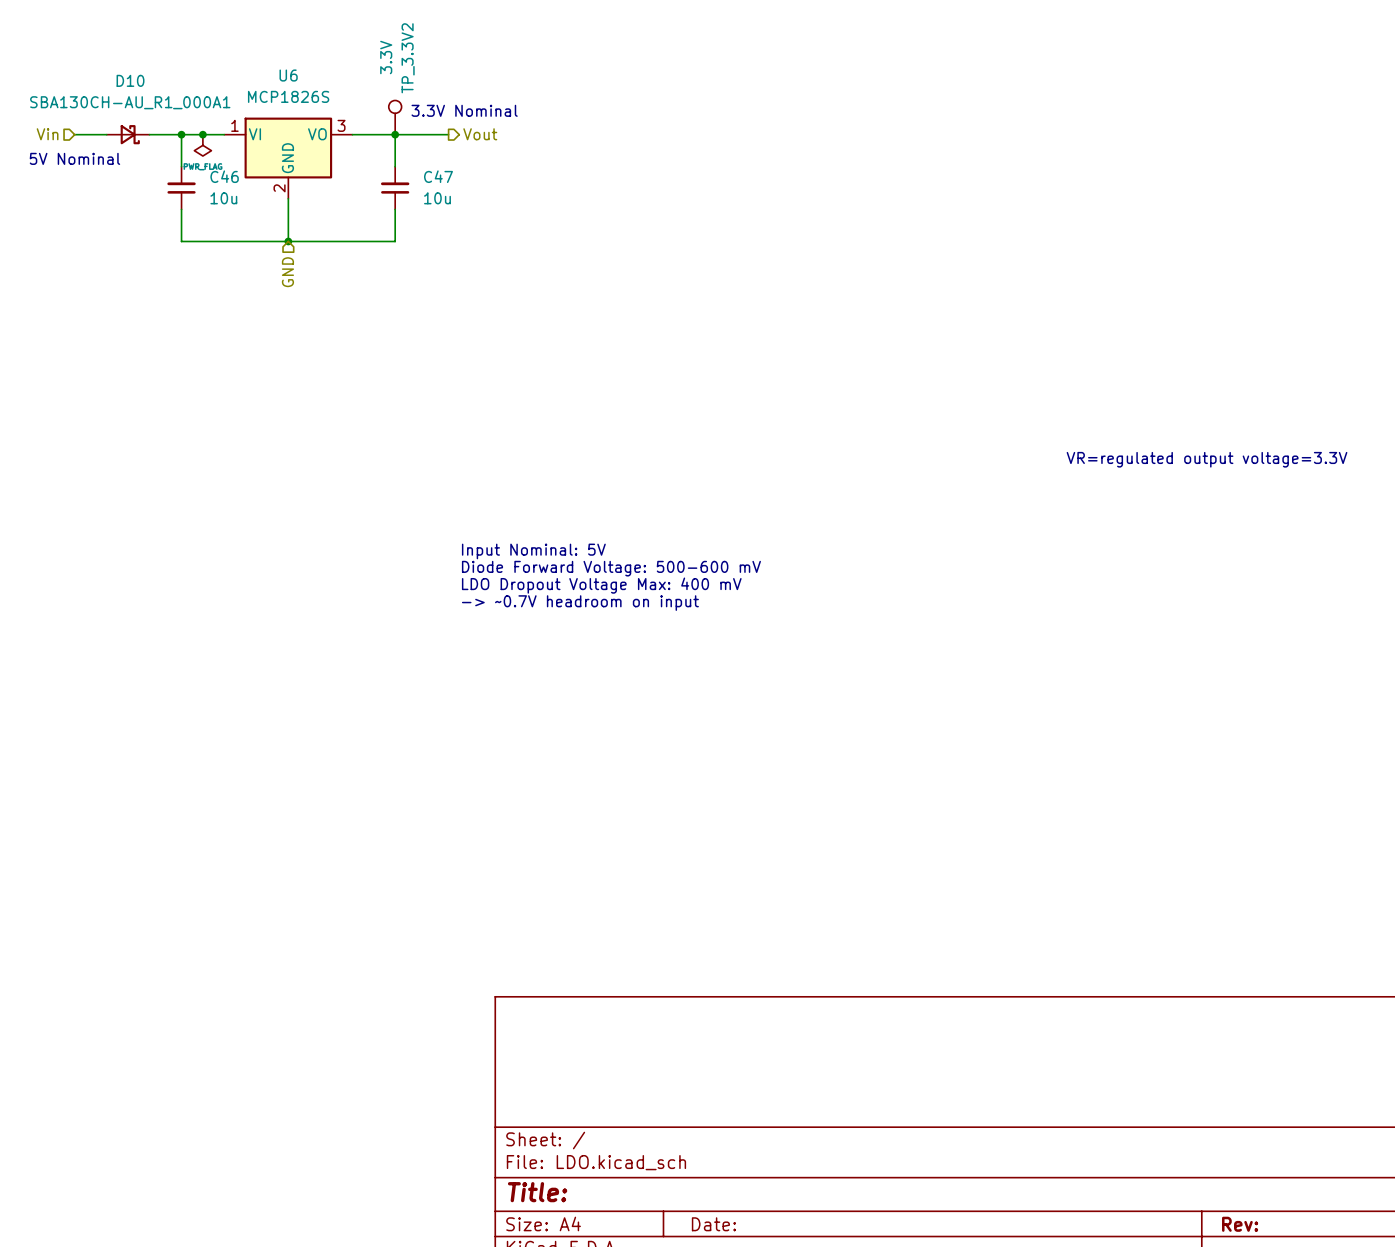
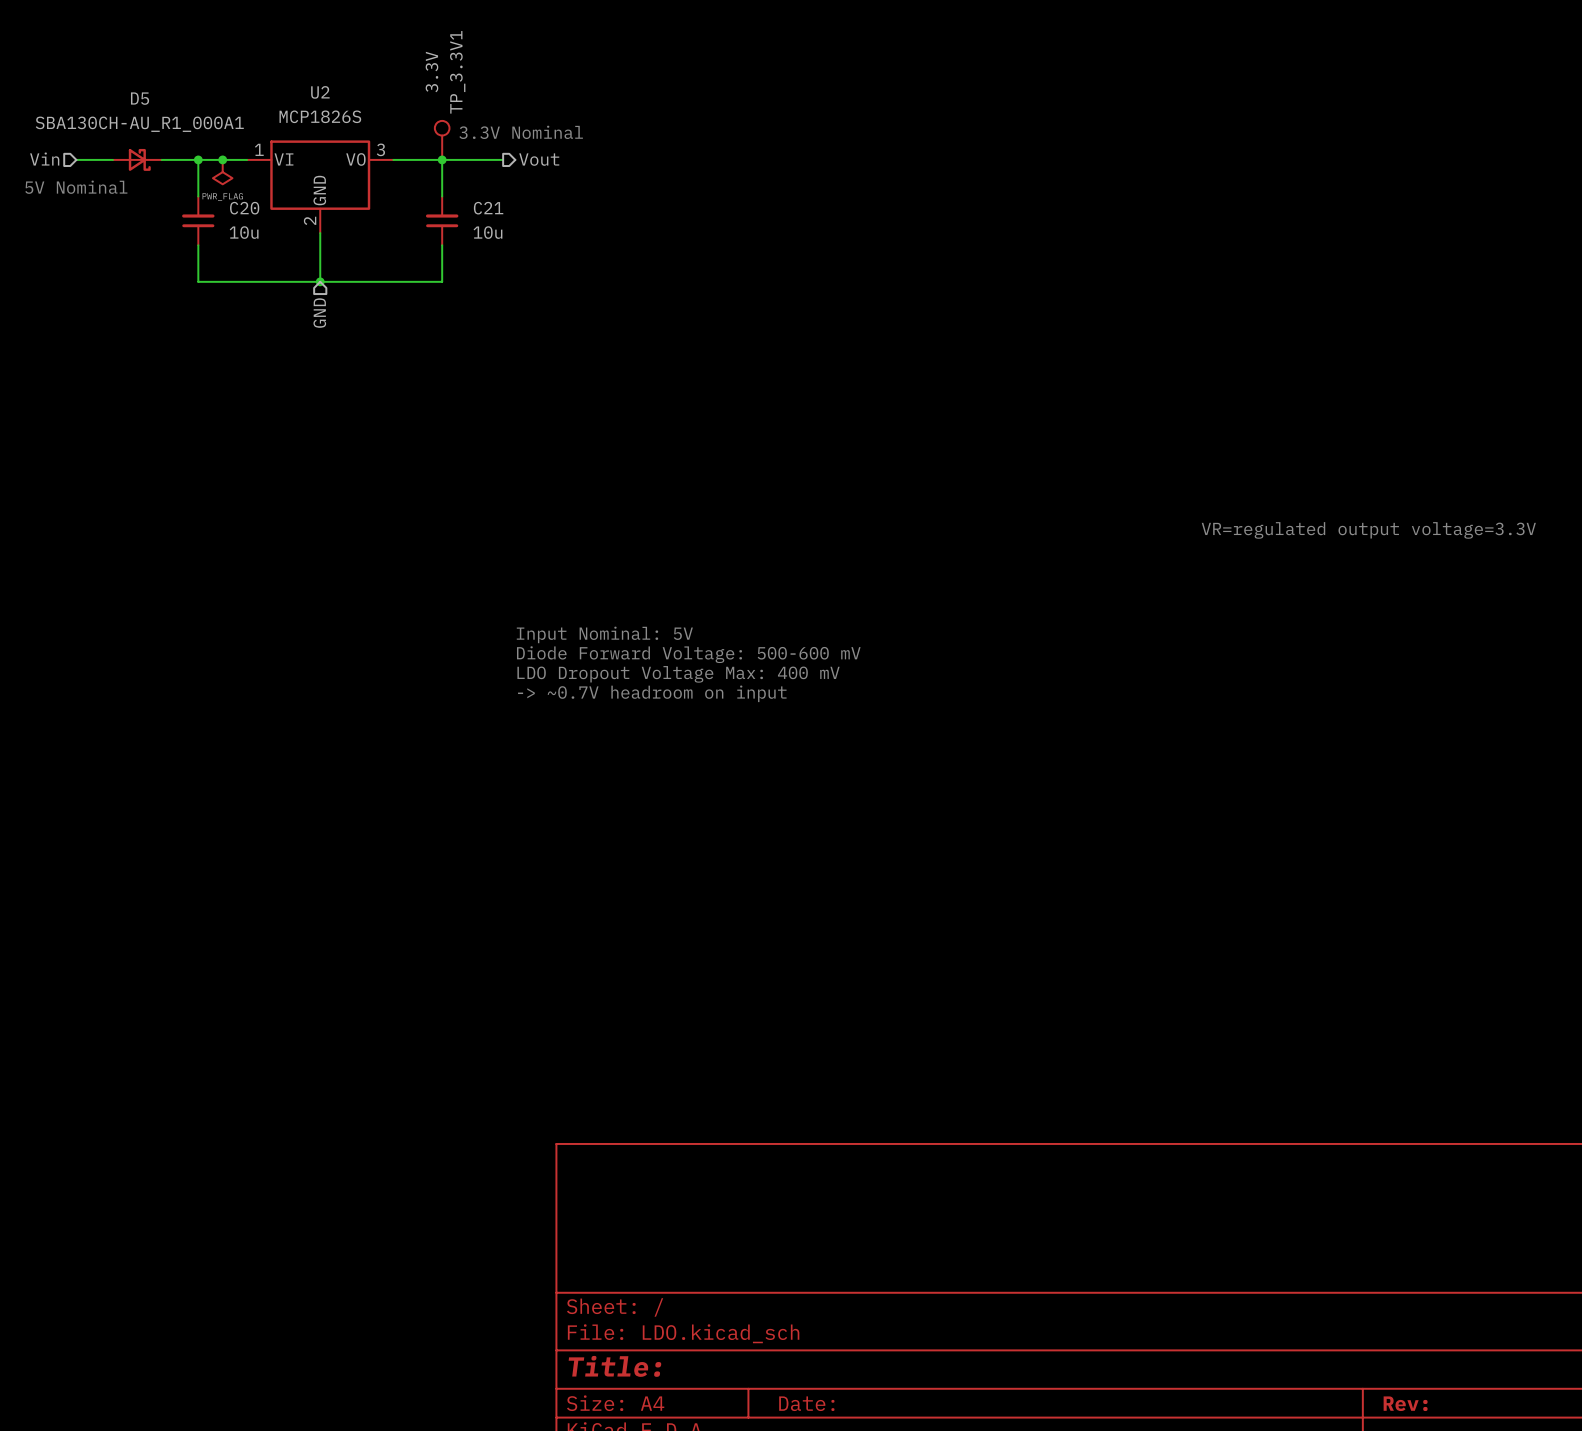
TP_3.3V2 name: TP_3.3V2 (408, 58) -> TP_3.3V1 (457, 72)
U6 name: U6 (288, 75) -> U2 (320, 92)
D10 name: D10 (130, 80) -> D5 (140, 98)
C46 name: C46 (224, 176) -> C20 (244, 208)
C47 name: C47 (438, 176) -> C21 (488, 208)

